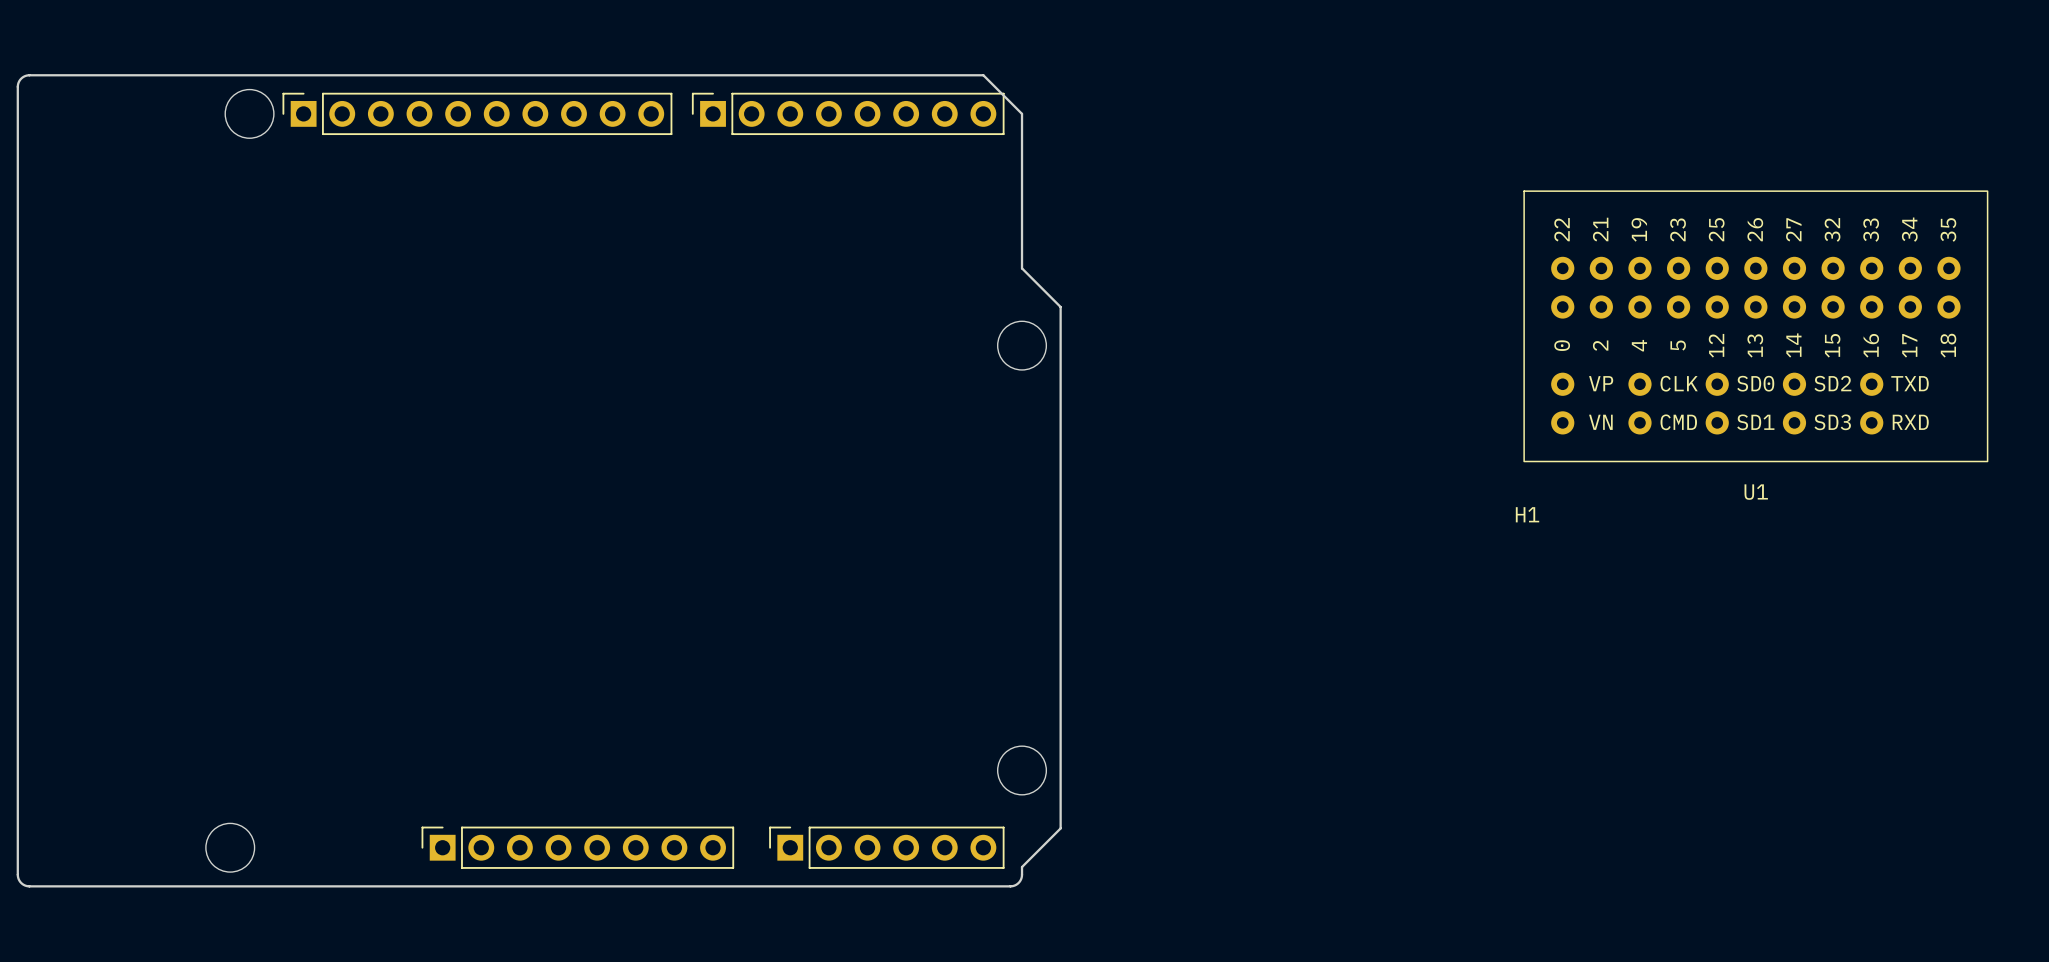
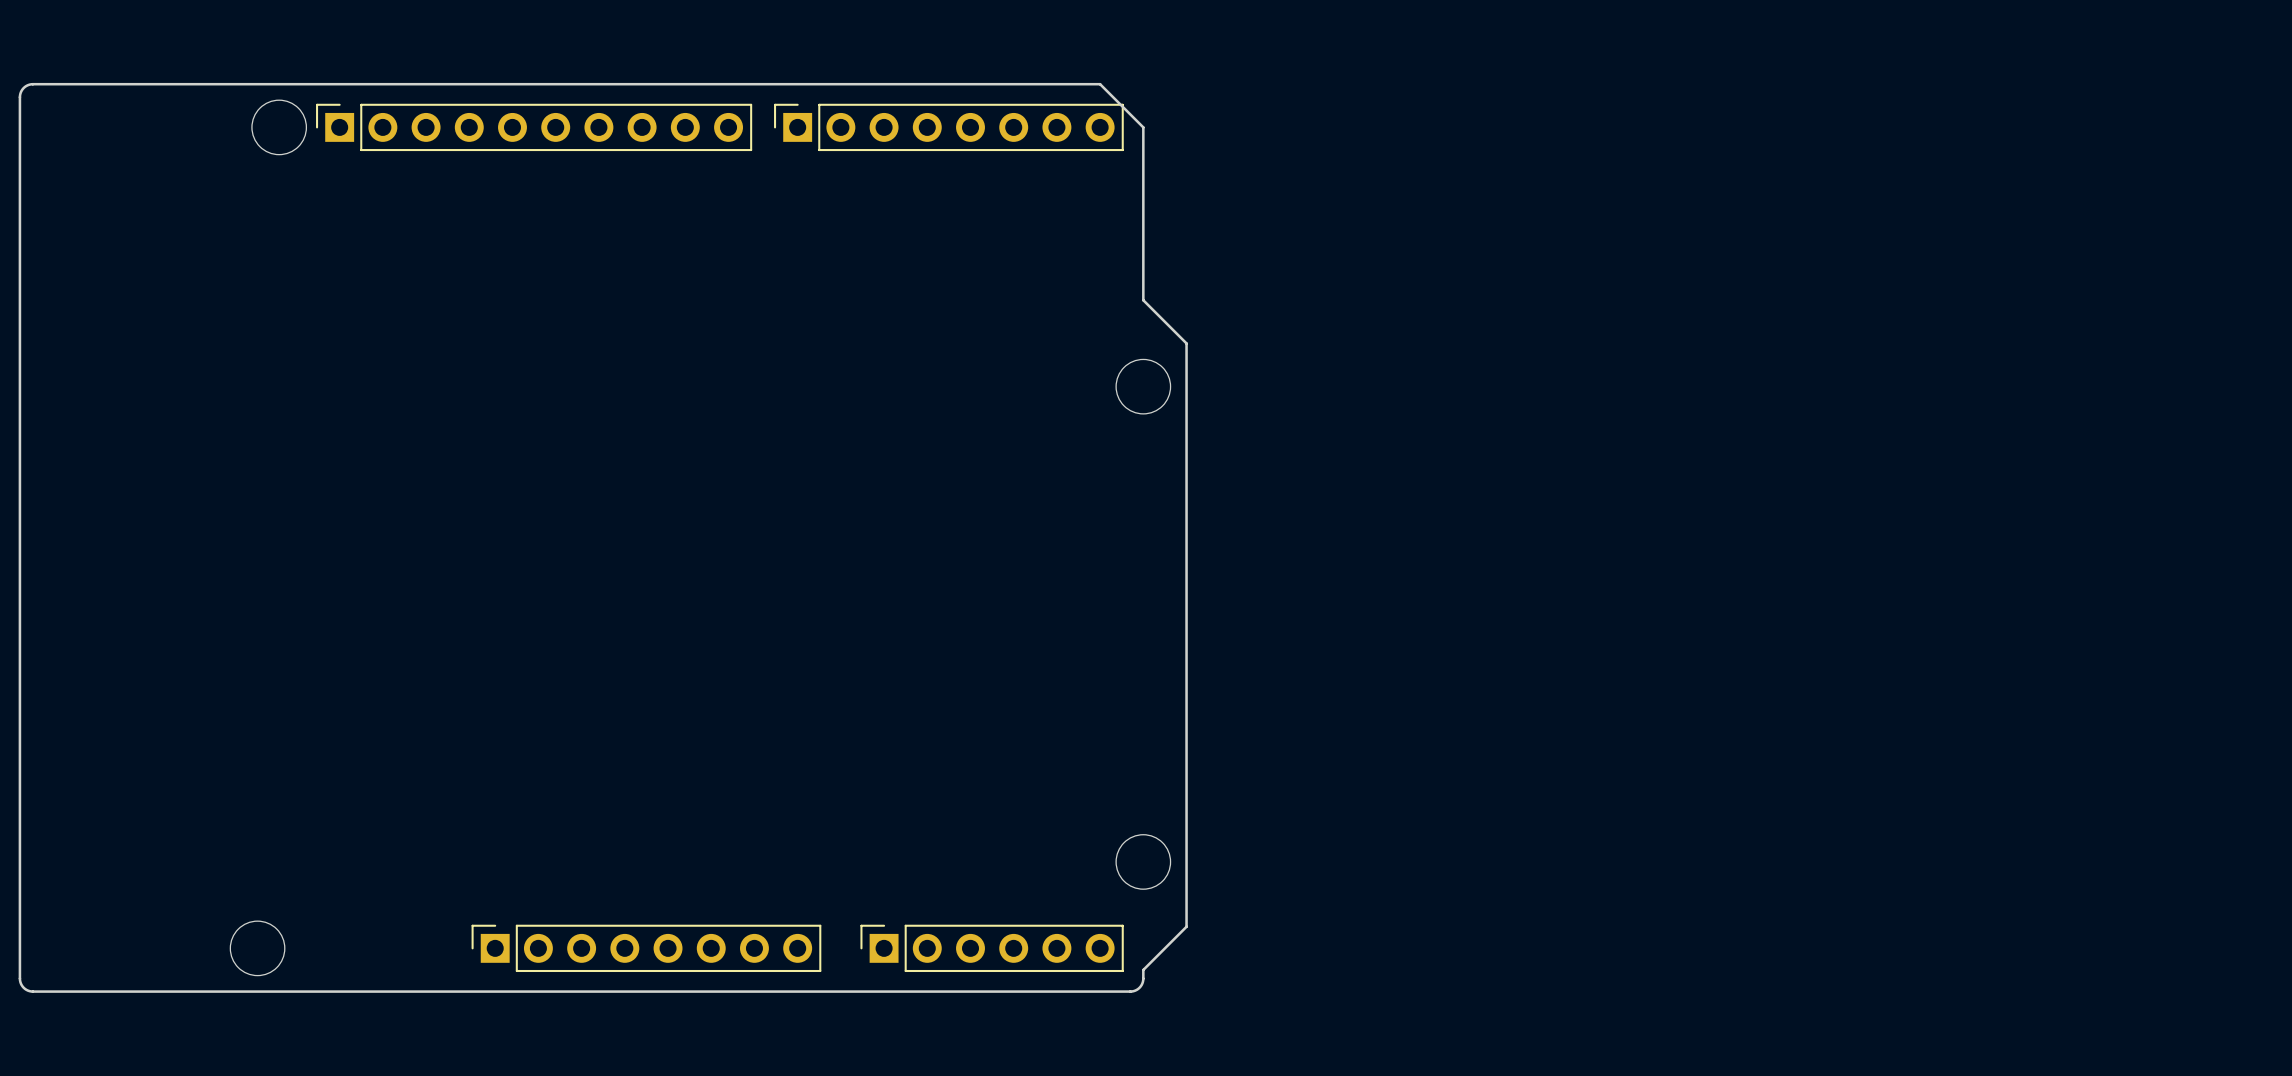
U1: (1755, 326) -> none
H1: (1527, 514) -> none

